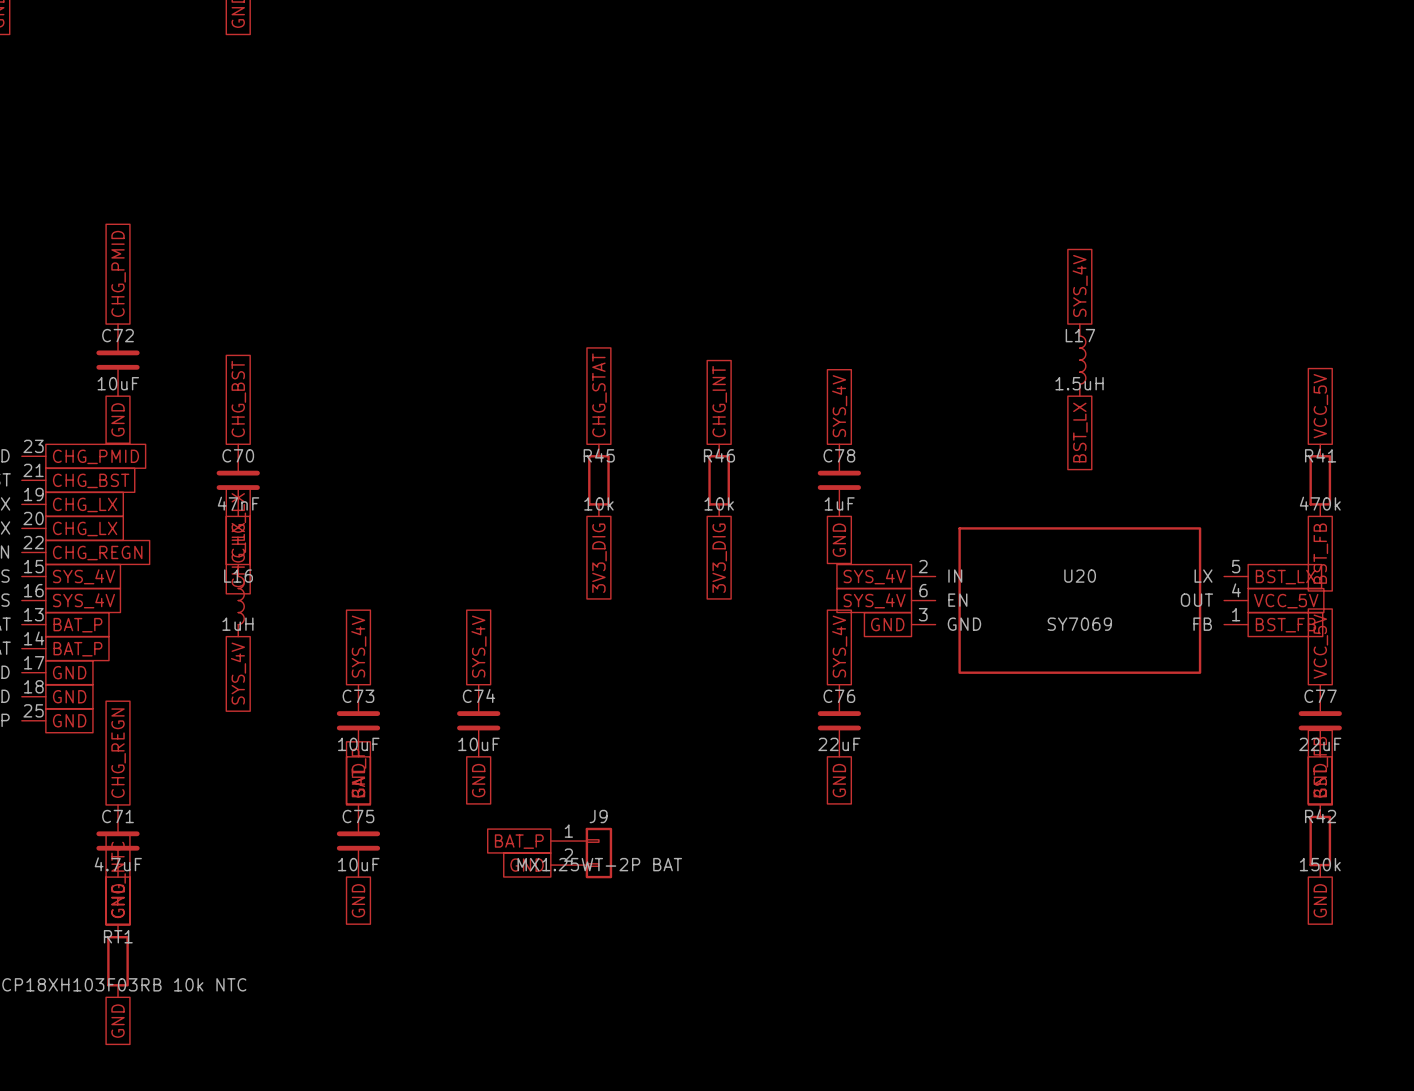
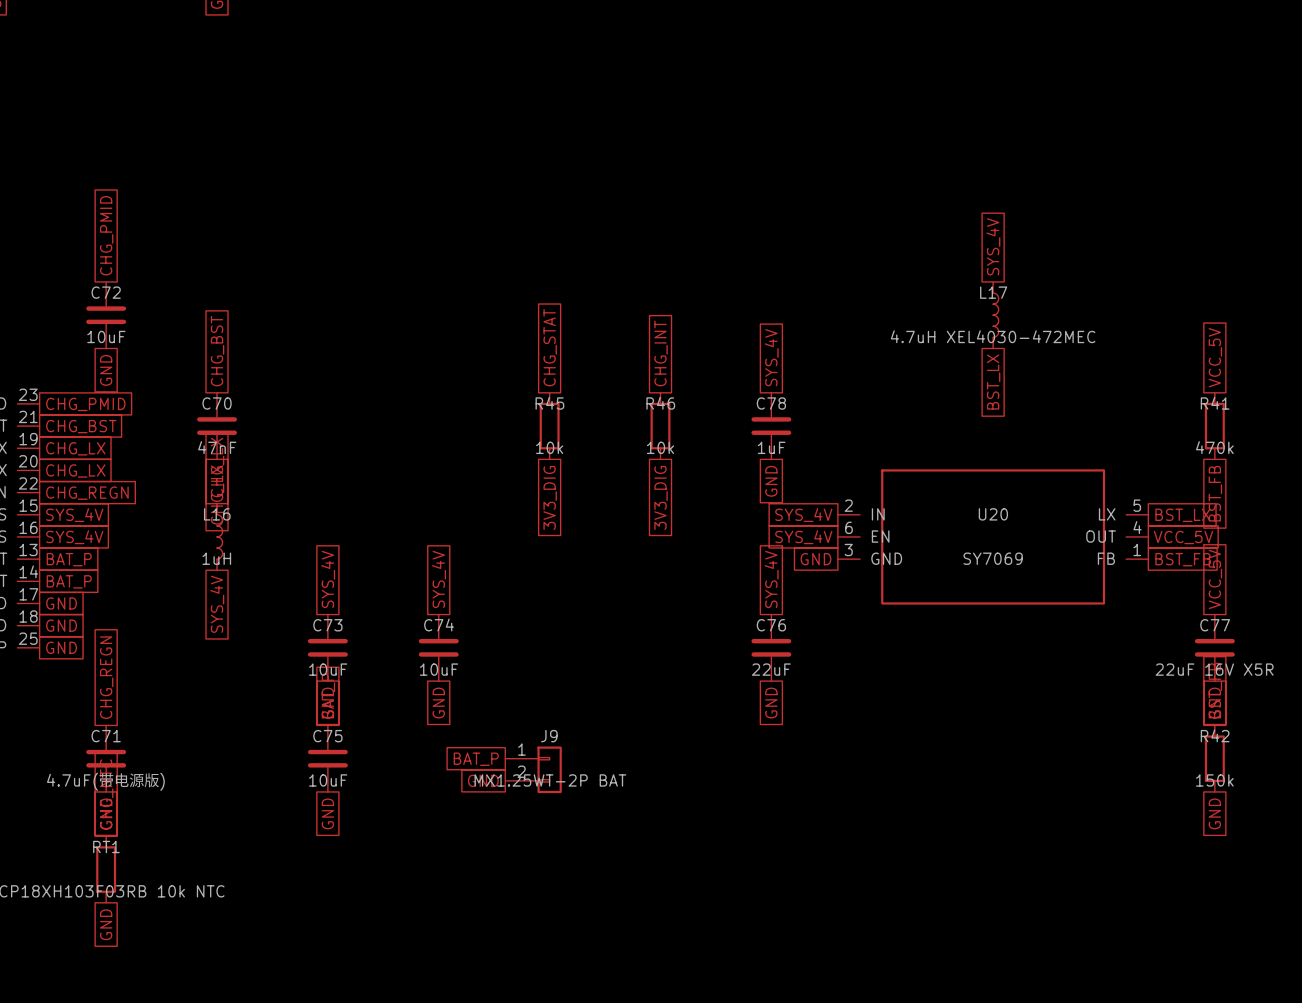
L17 value: 1.5uH (1079, 383) -> 4.7uH XEL4030-472MEC (993, 336)
C77 value: 22uF (1320, 744) -> 22uF 16V X5R (1214, 669)
C71 value: 4.7uF (118, 864) -> 4.7uF(带电源版) (105, 781)

